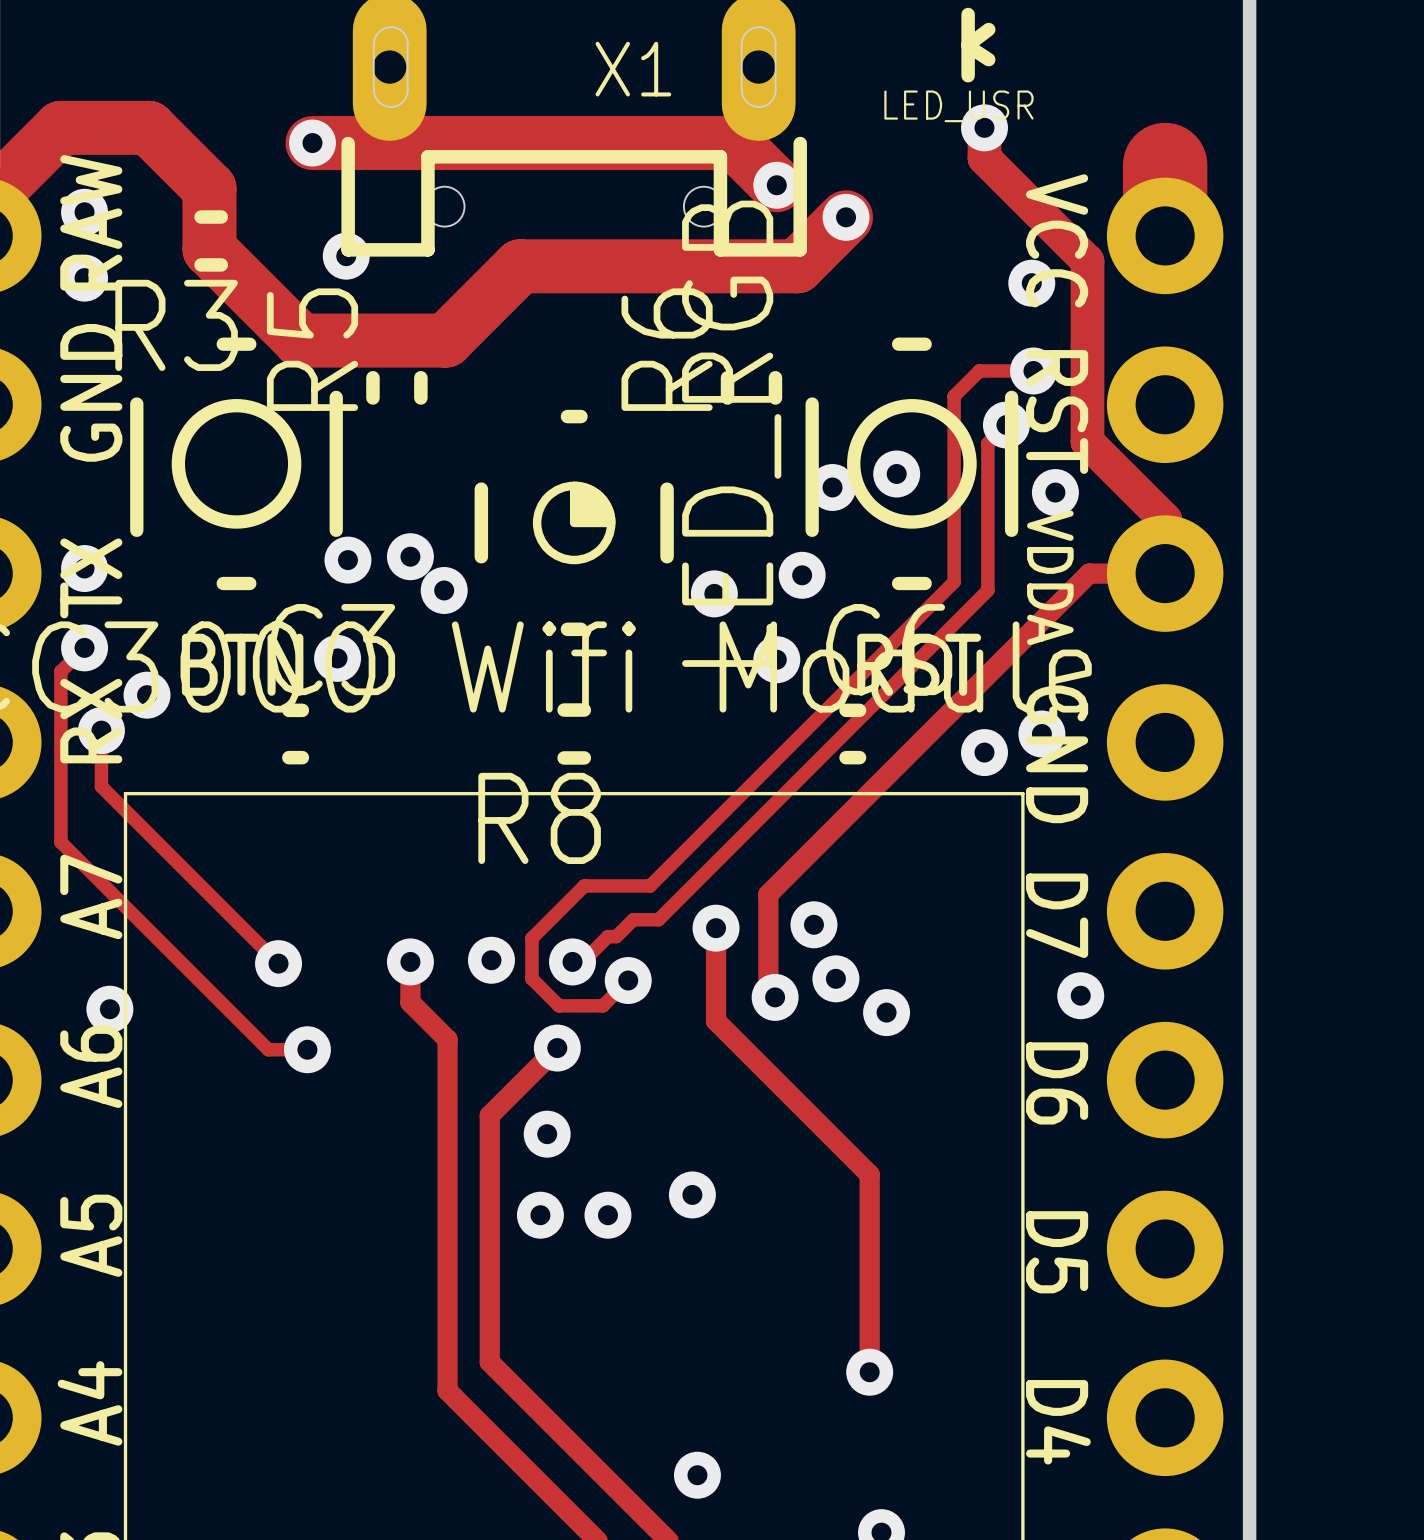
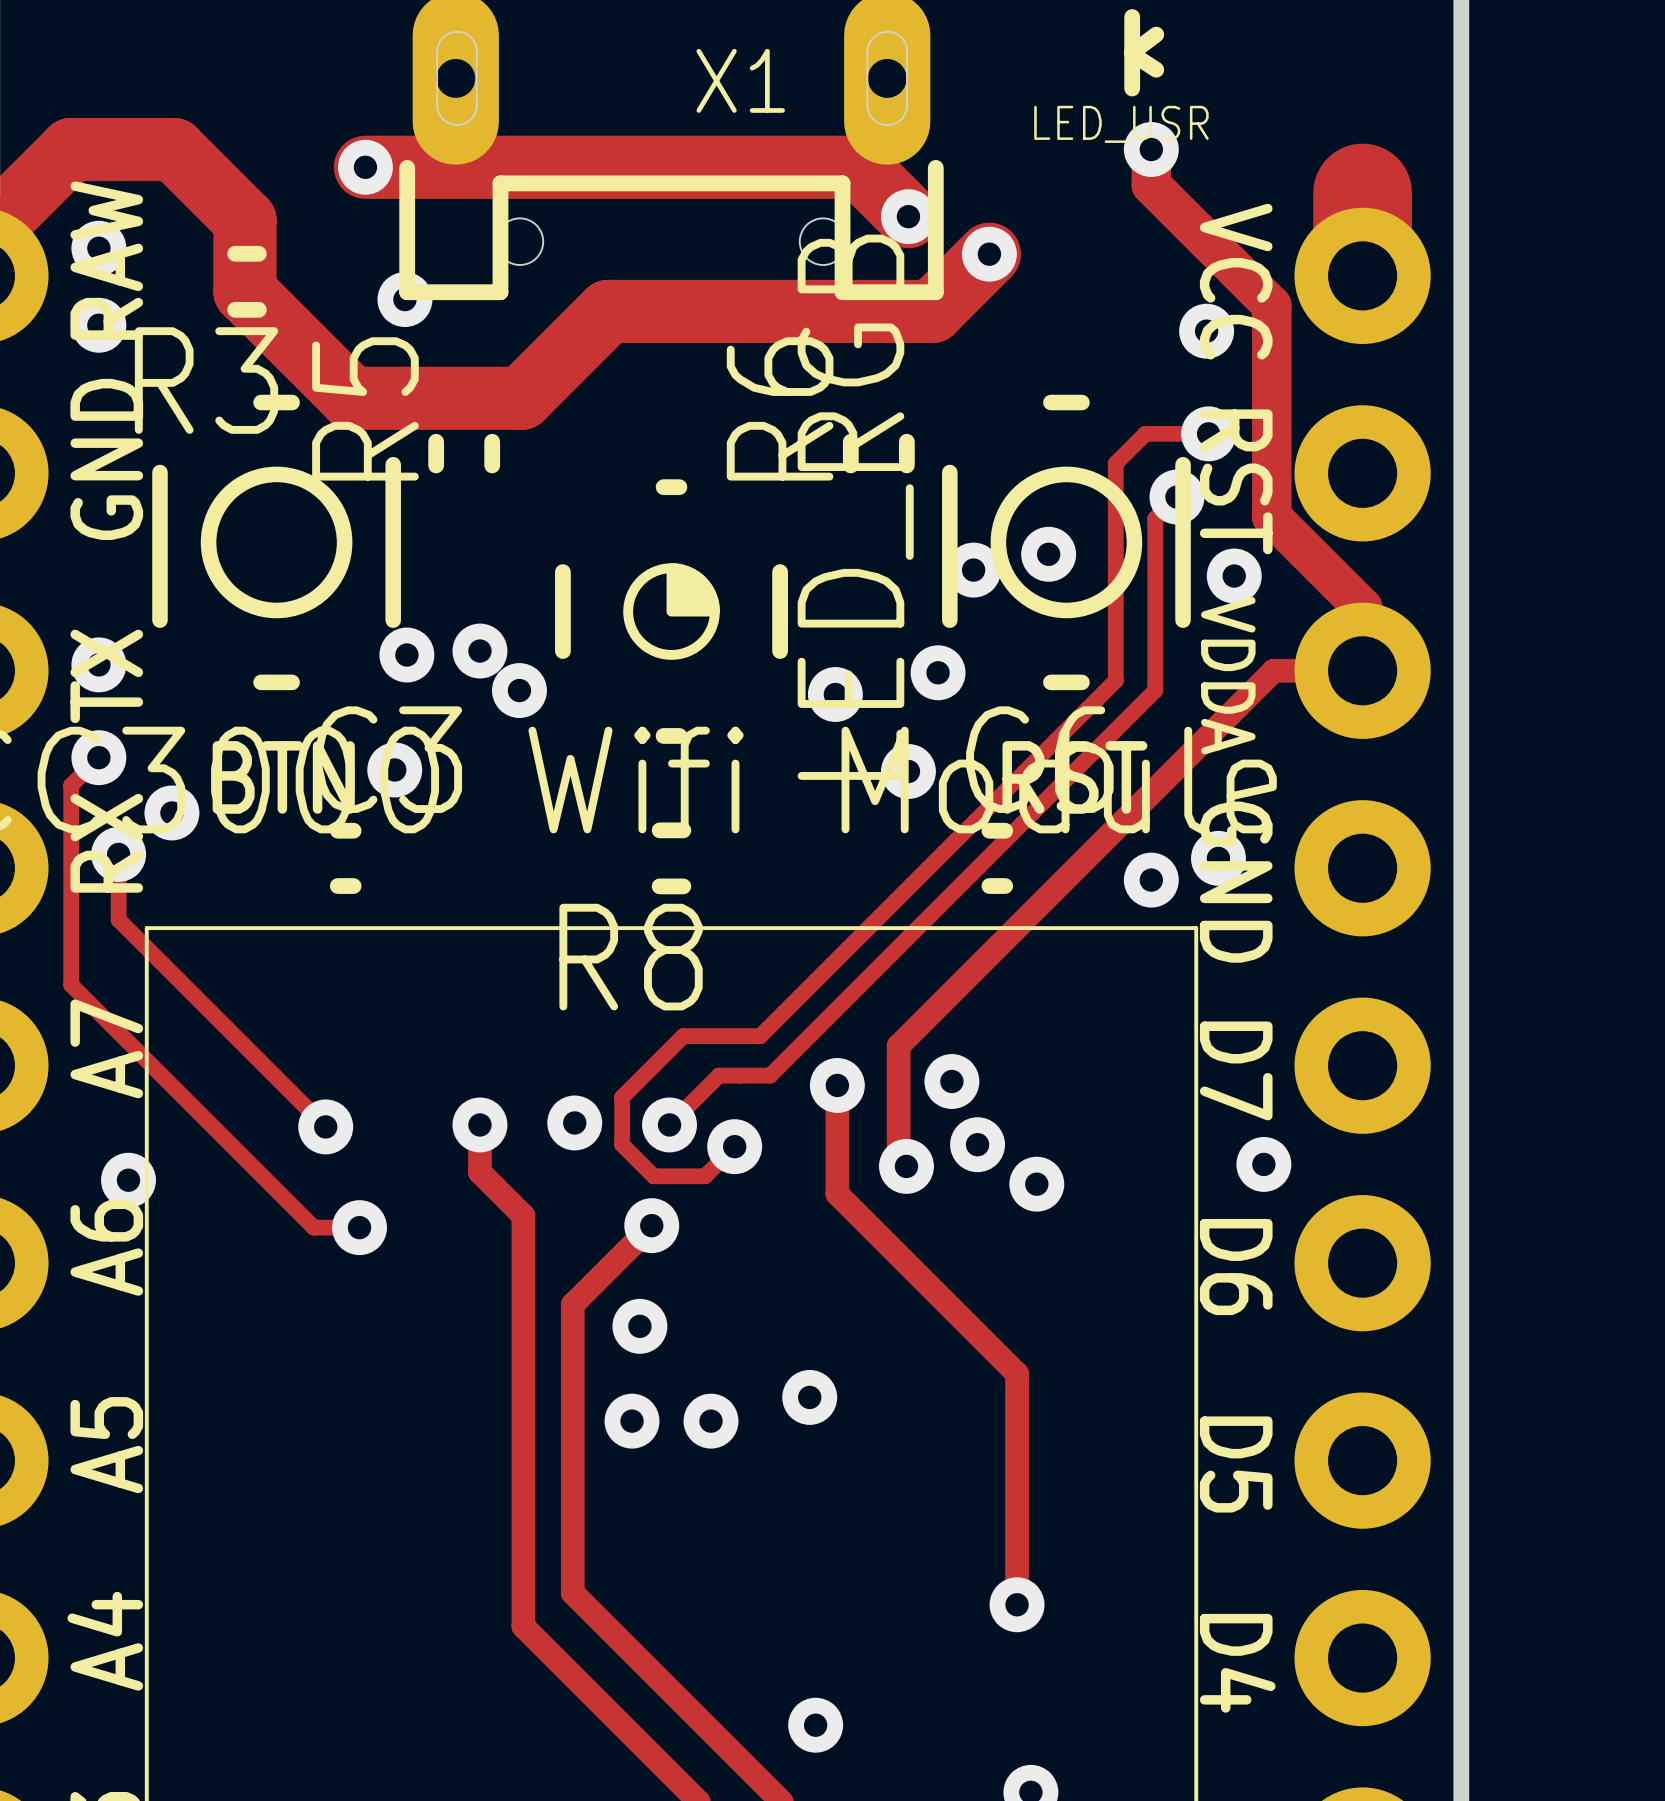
track: (633, 919) (616, 936) (607, 936) (582, 961) (572, 961) -> (740, 1075) (718, 1075) (669, 1124)

